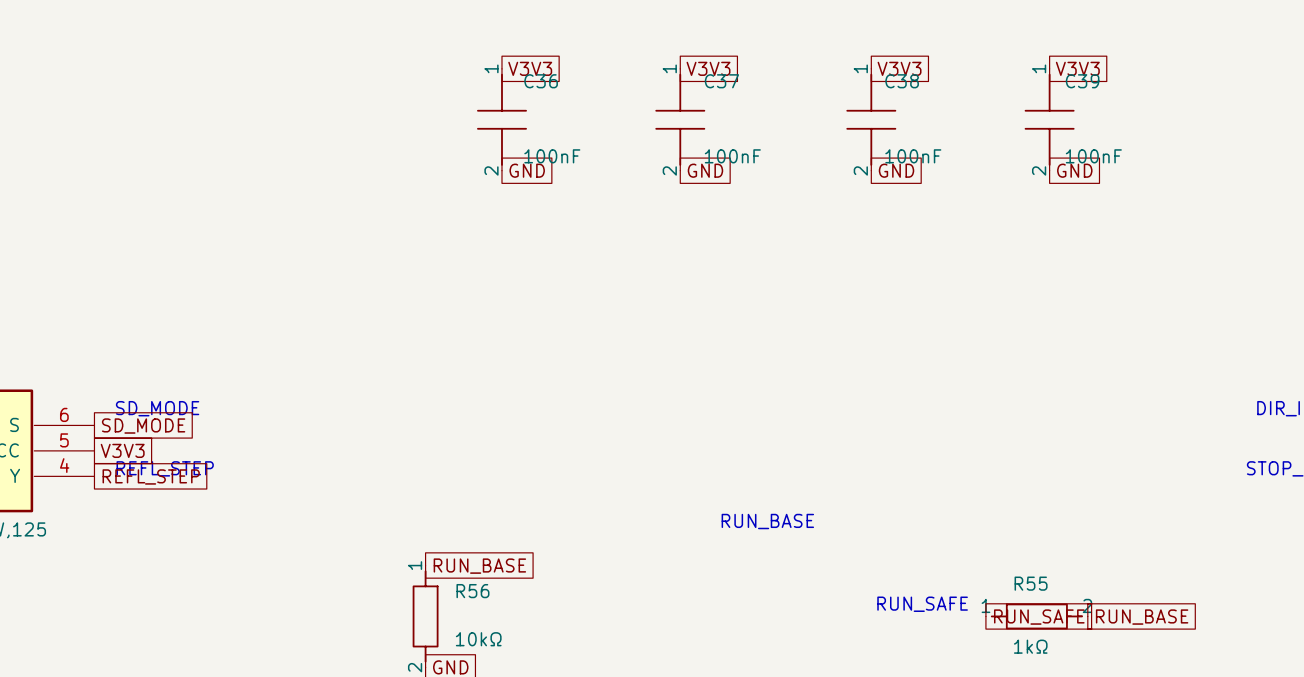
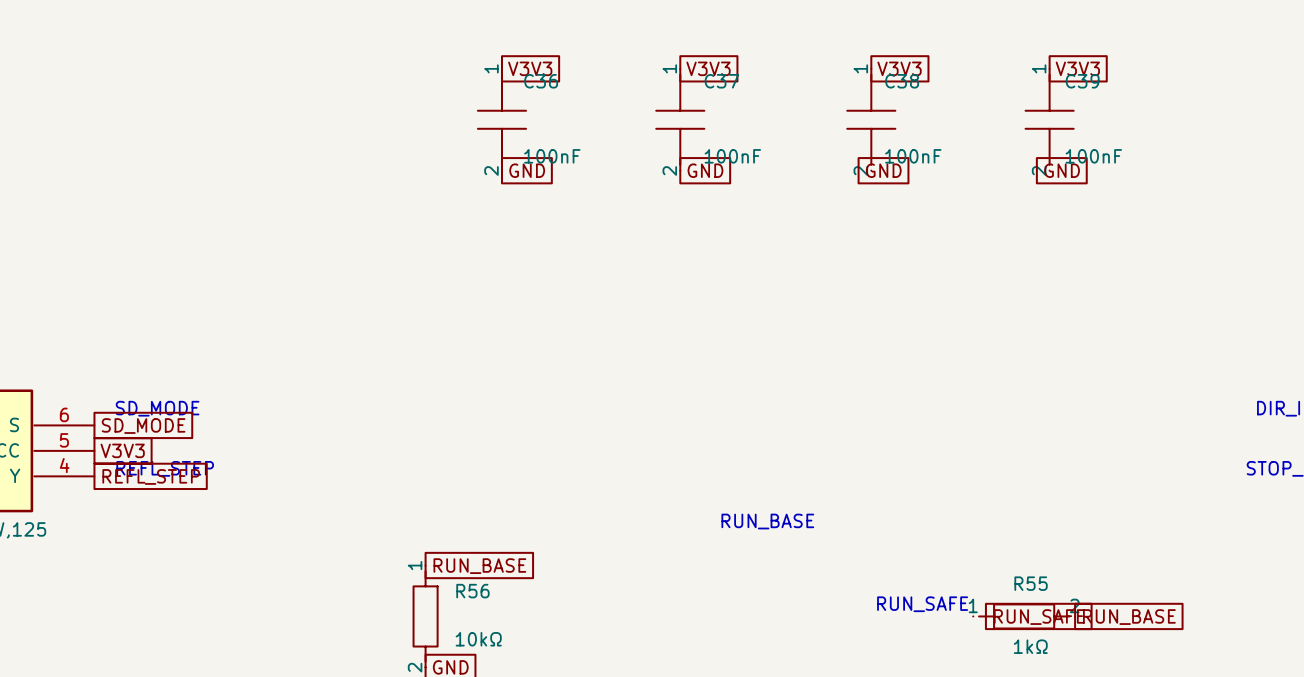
global label position: GND (896, 170) -> GND (883, 170)
global label position: GND (1074, 170) -> GND (1062, 170)
R55 position: (1036, 616) -> (1024, 616)
global label position: RUN_BASE (1142, 617) -> RUN_BASE (1129, 617)

